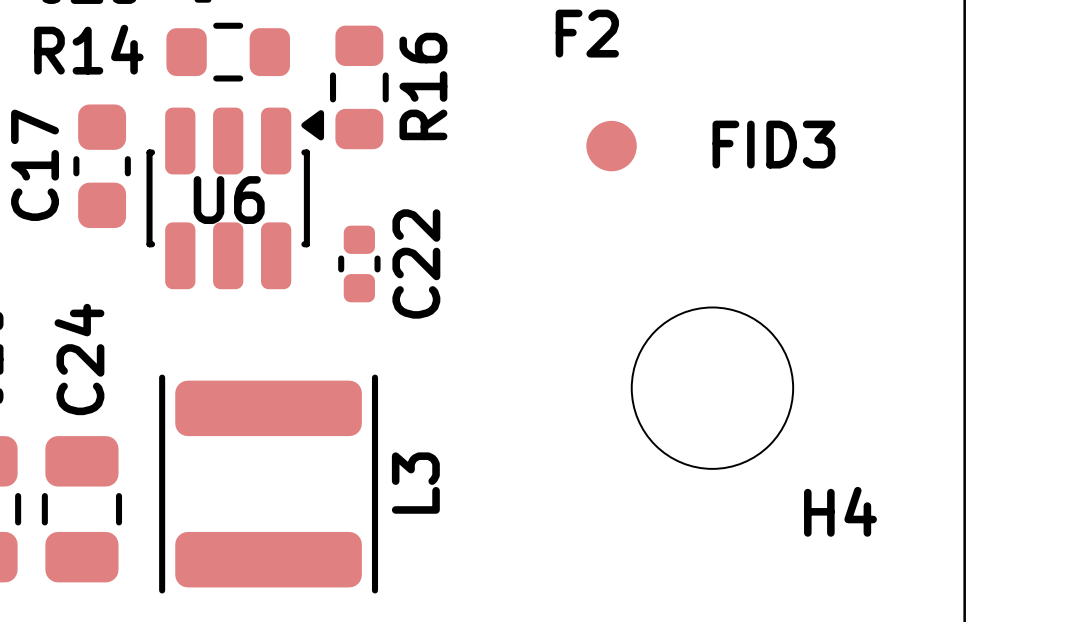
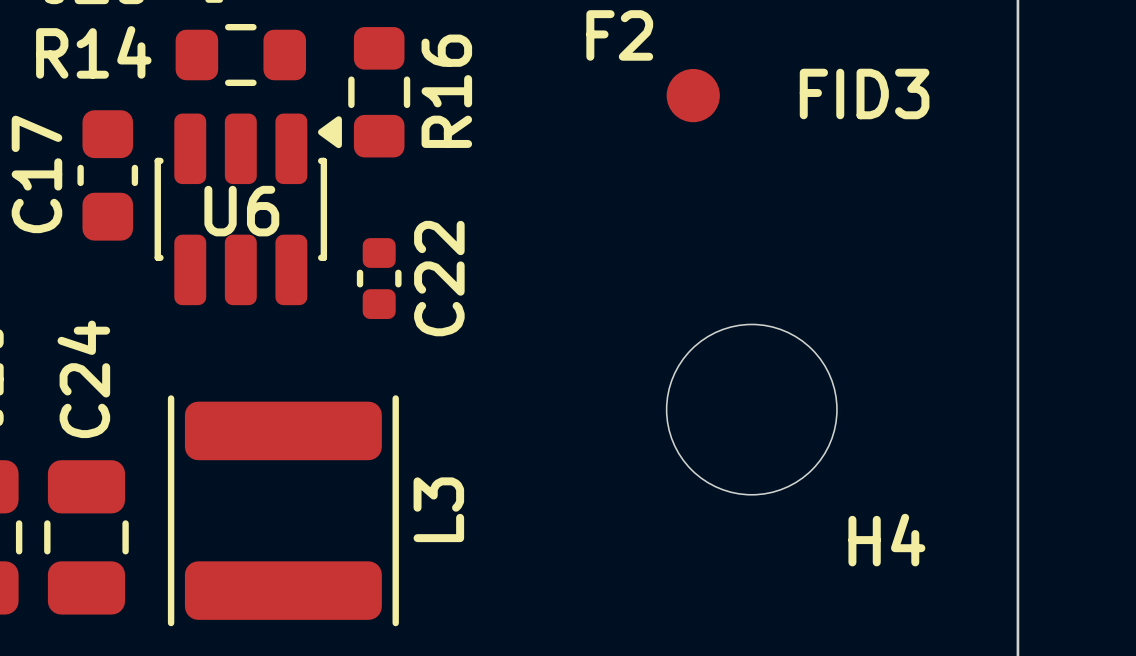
FID3 position: (611, 146) -> (693, 95)

